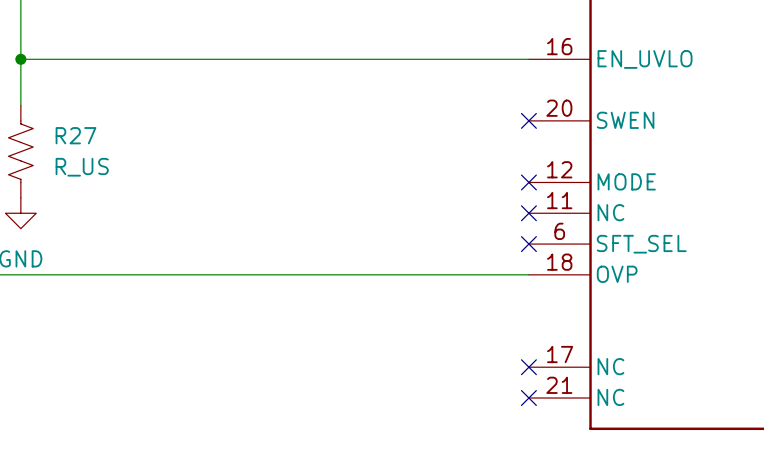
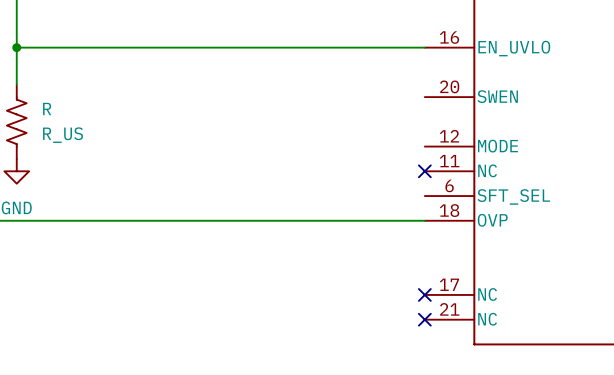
no-connect mark: (528, 120) -> none
R27 name: R27 (75, 135) -> R (47, 109)
no-connect mark: (528, 182) -> none
no-connect mark: (528, 244) -> none

